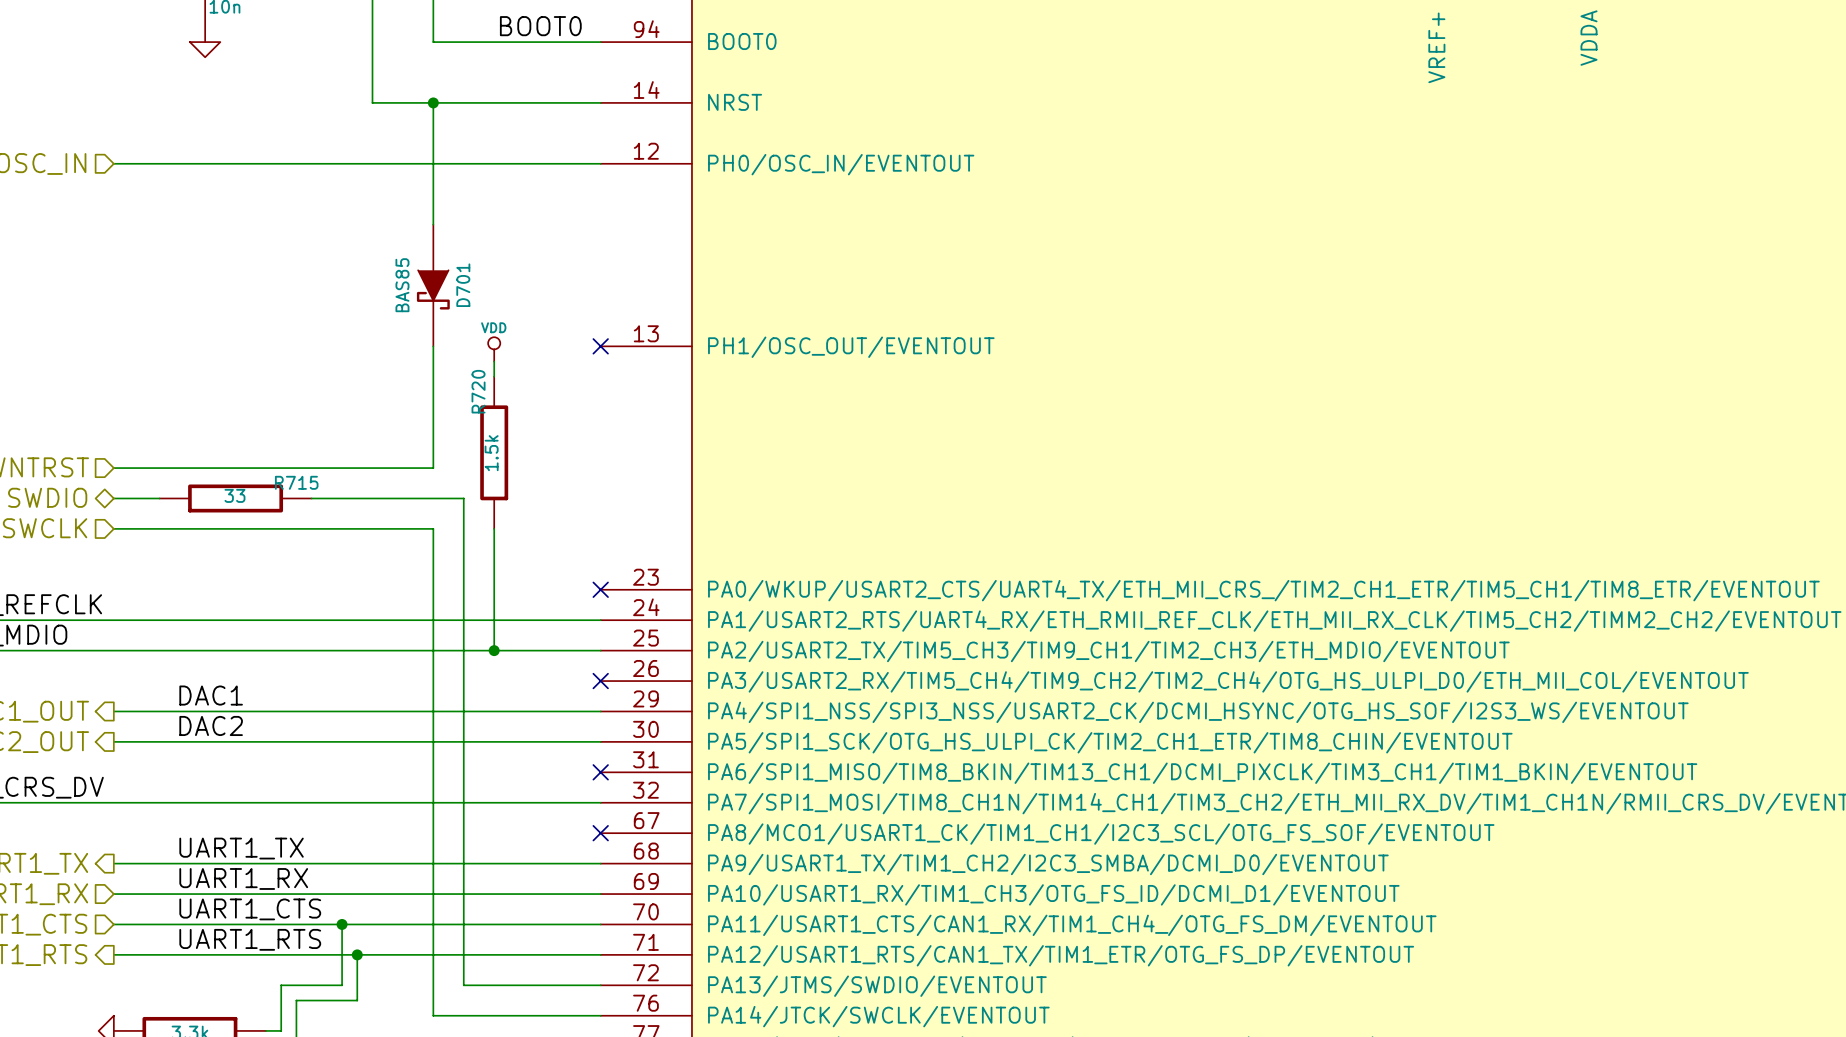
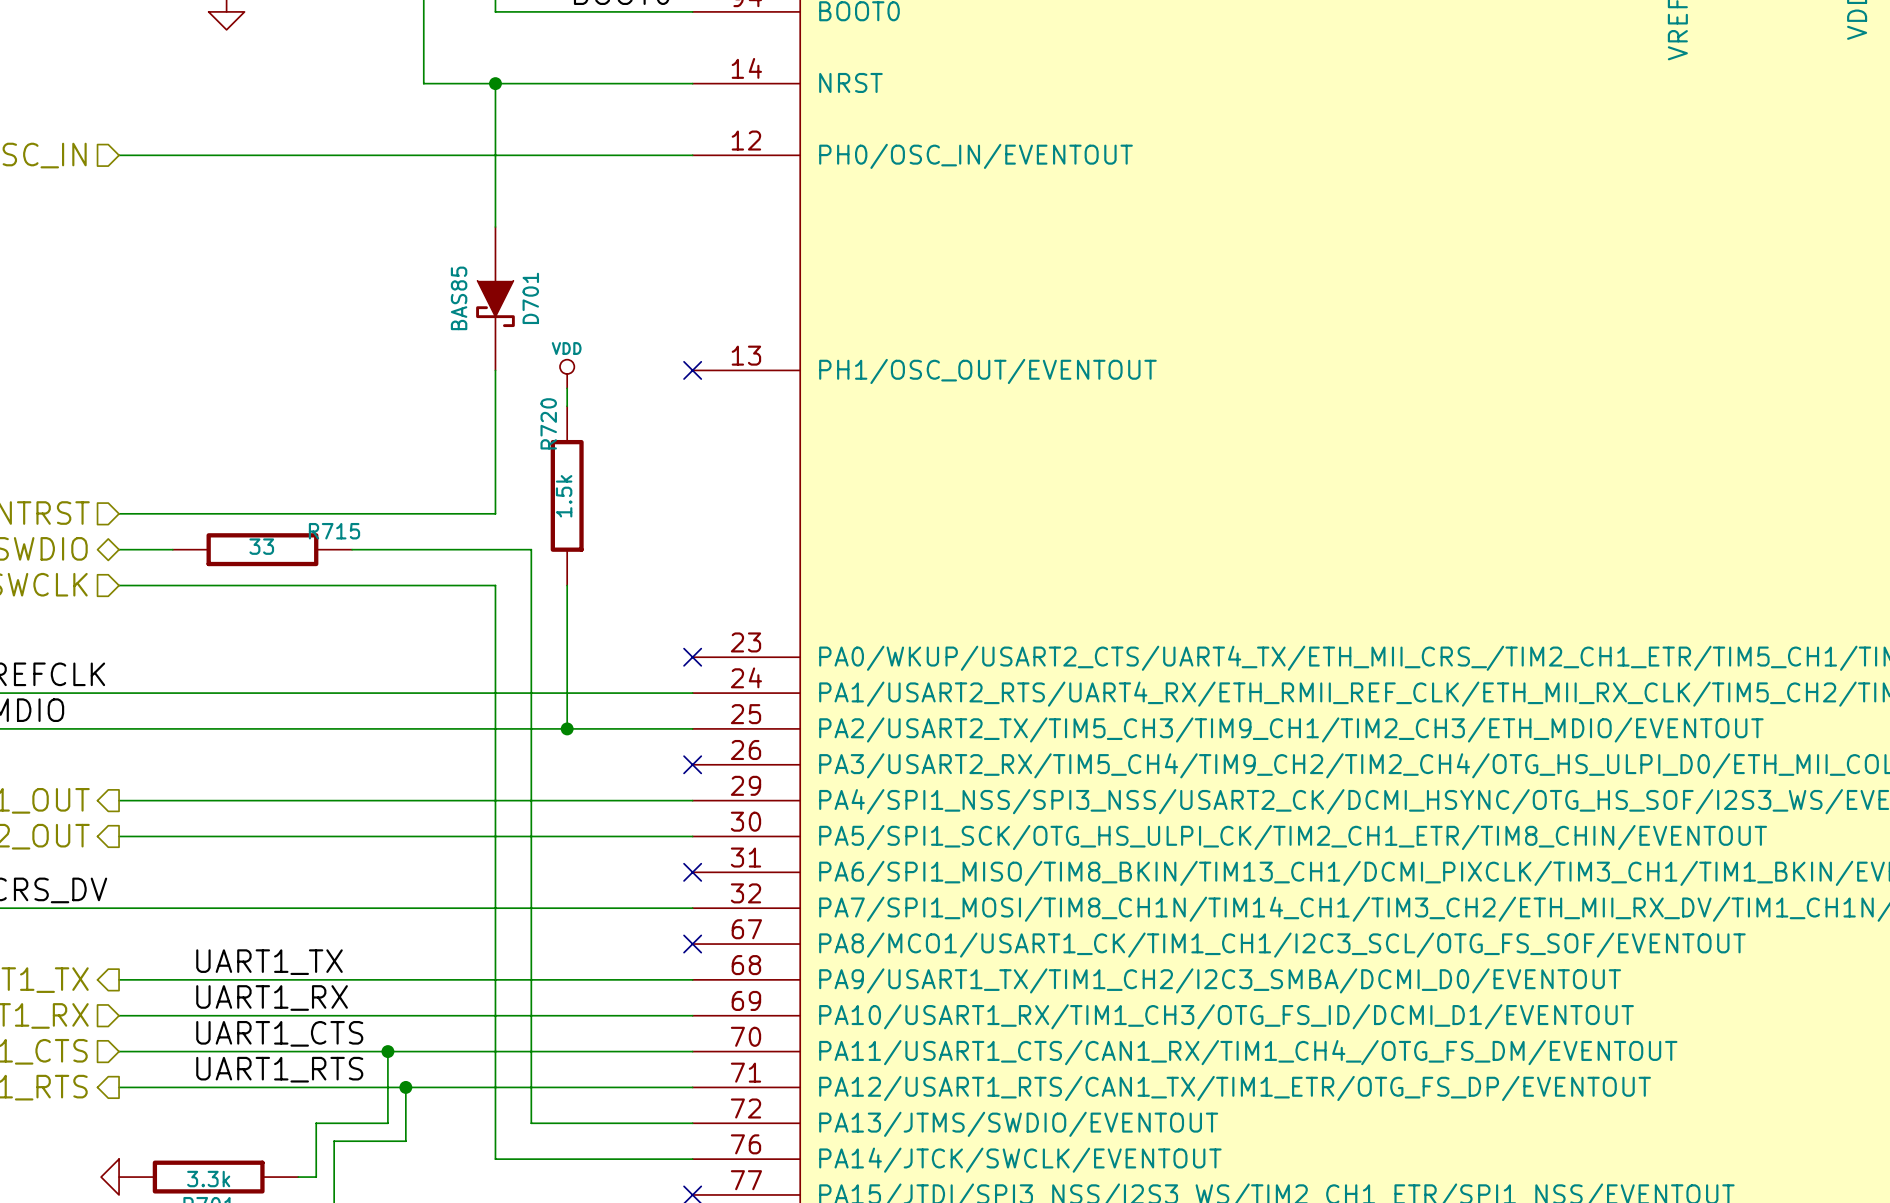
label: DAC1 (211, 695) -> none
label: DAC2 (211, 725) -> none

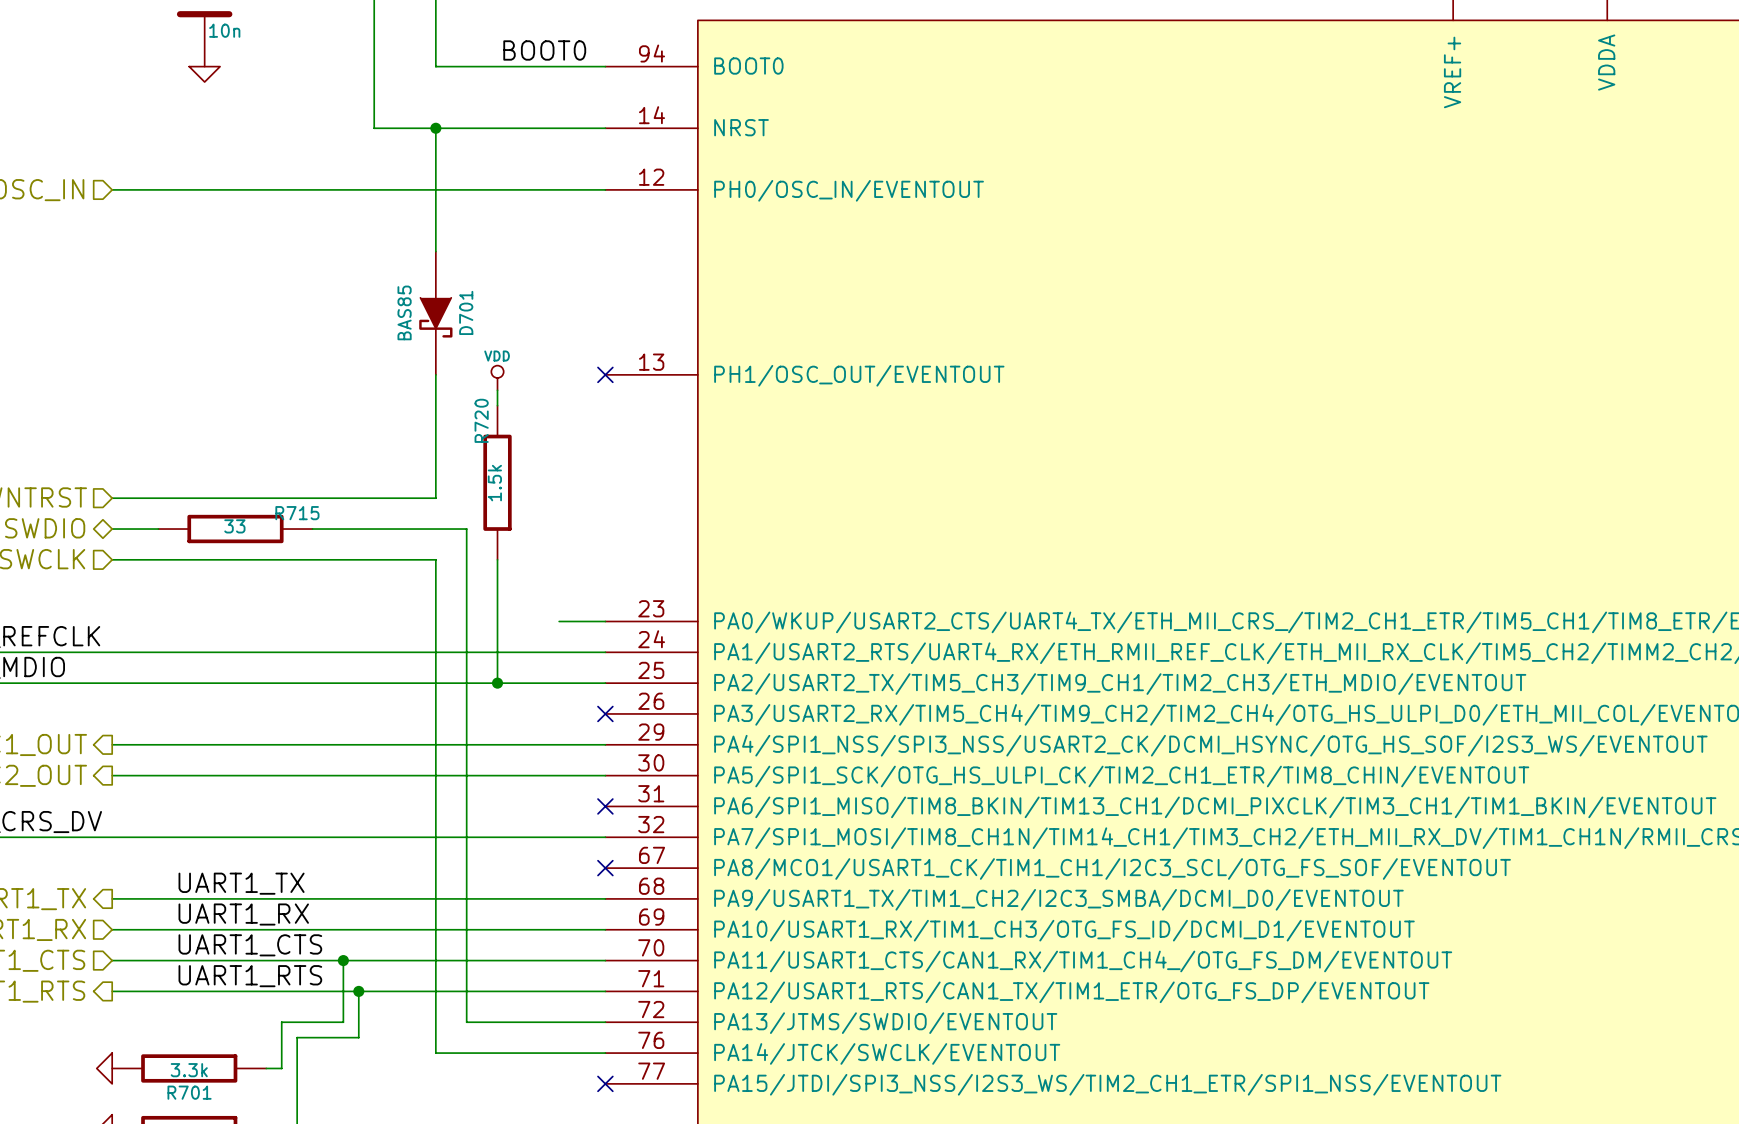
wire: none -> (559, 621) (605, 621)
no-connect mark: (692, 657) -> none

